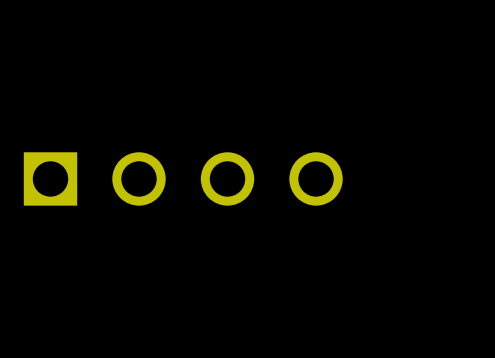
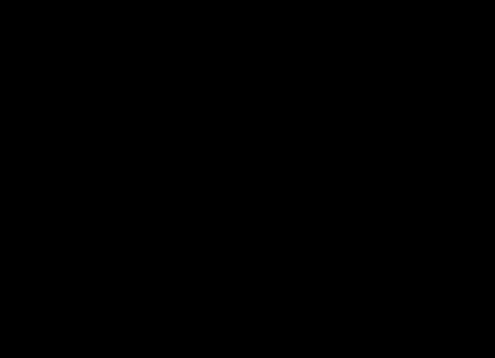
part: (183, 178) -> none

